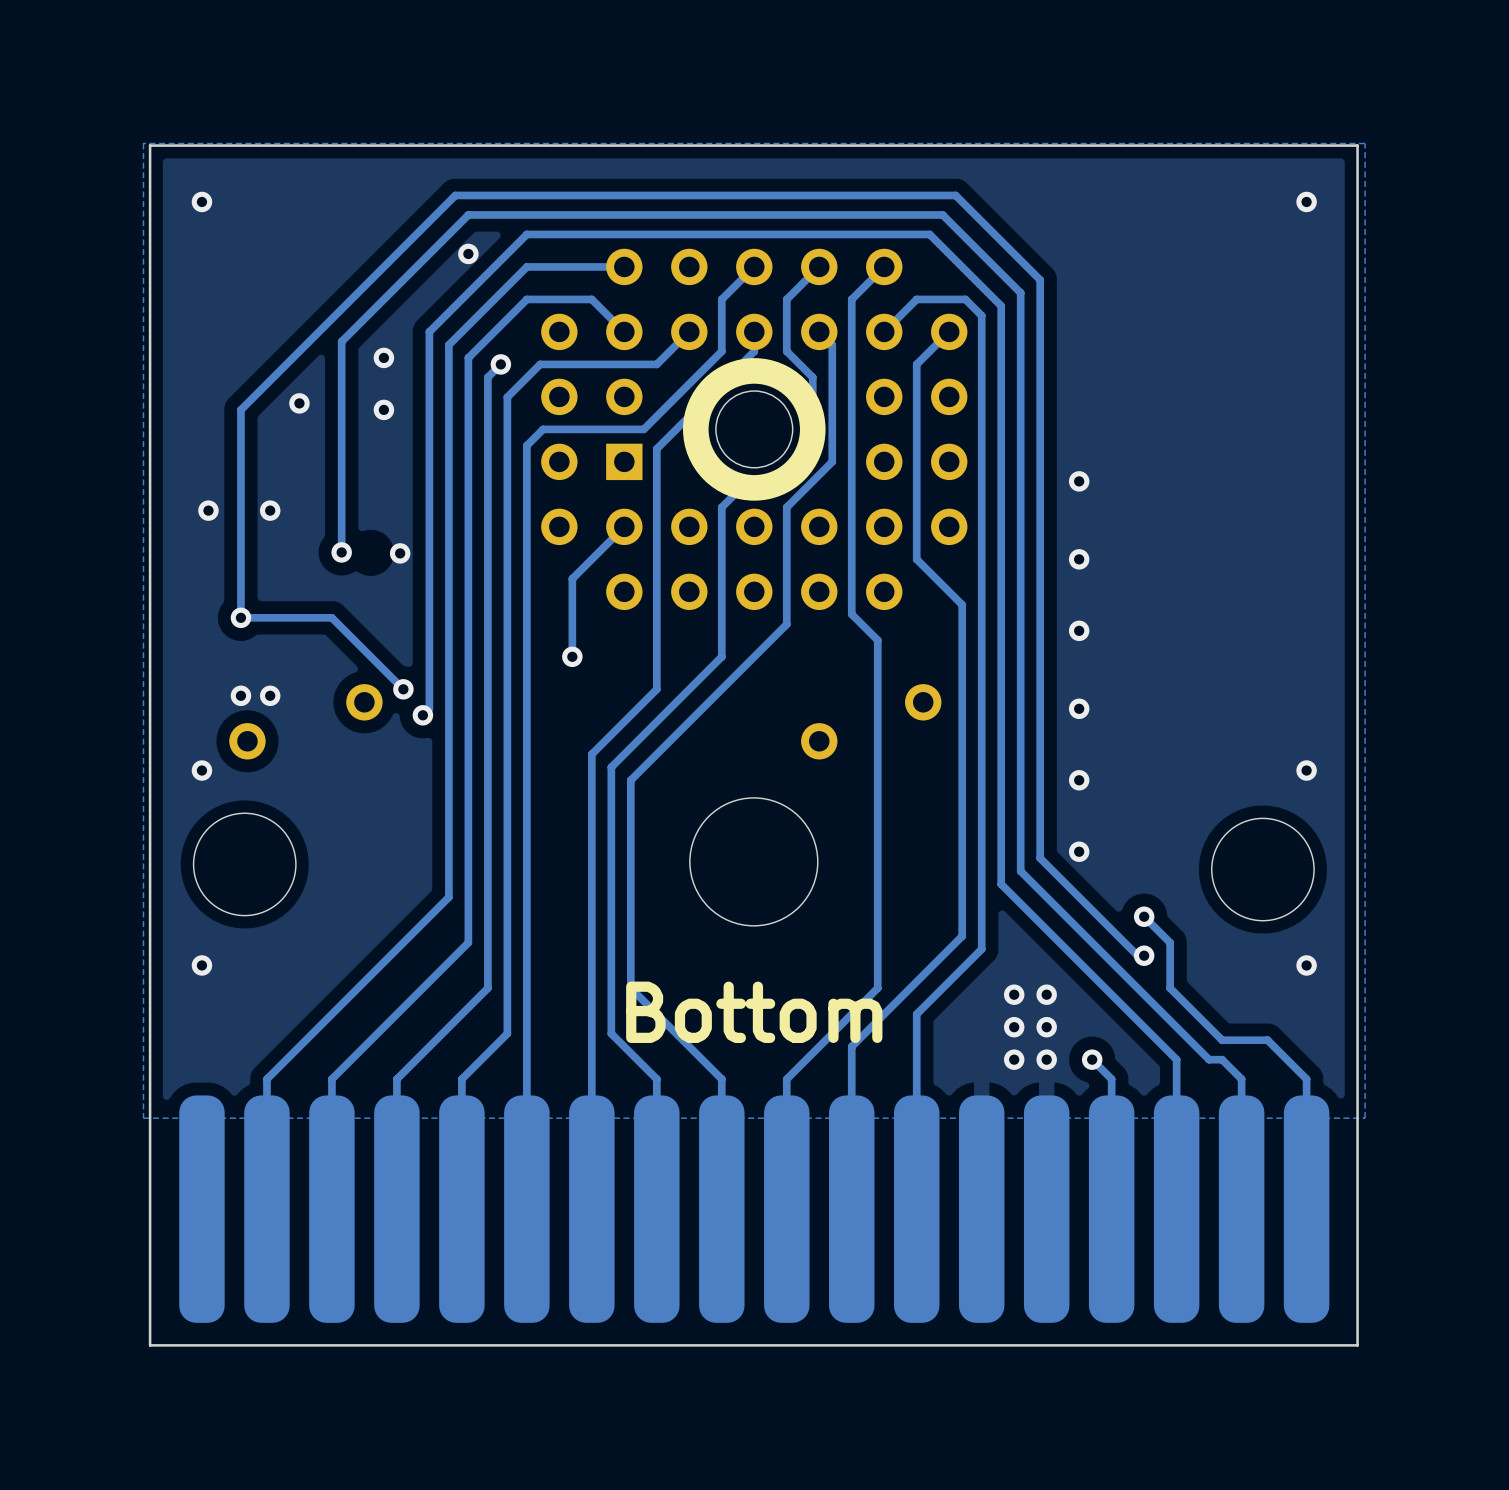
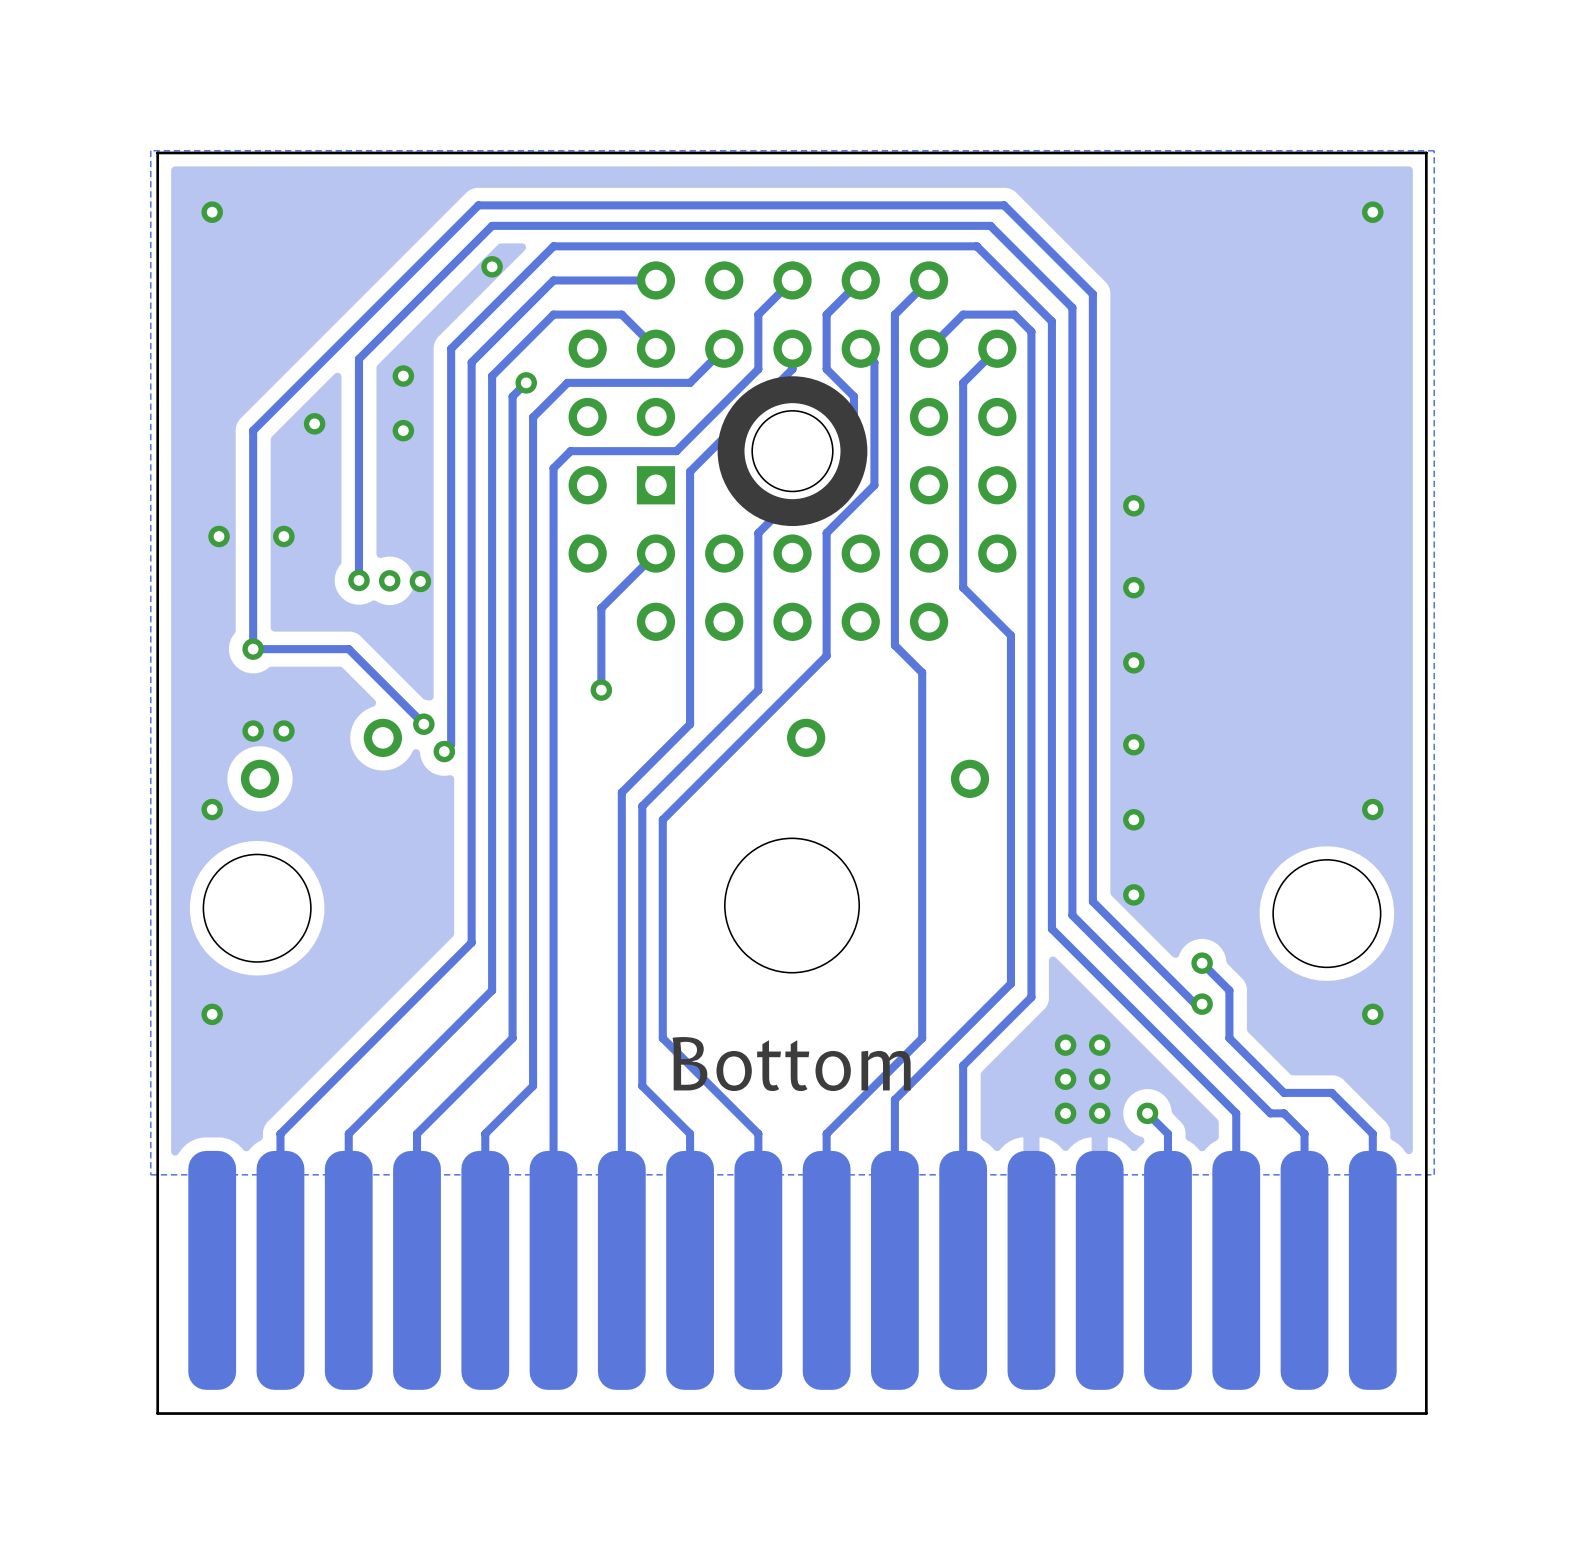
via: none -> (389, 580)
part: none -> (806, 737)
part position: (923, 702) -> (970, 778)
part: (819, 741) -> none

